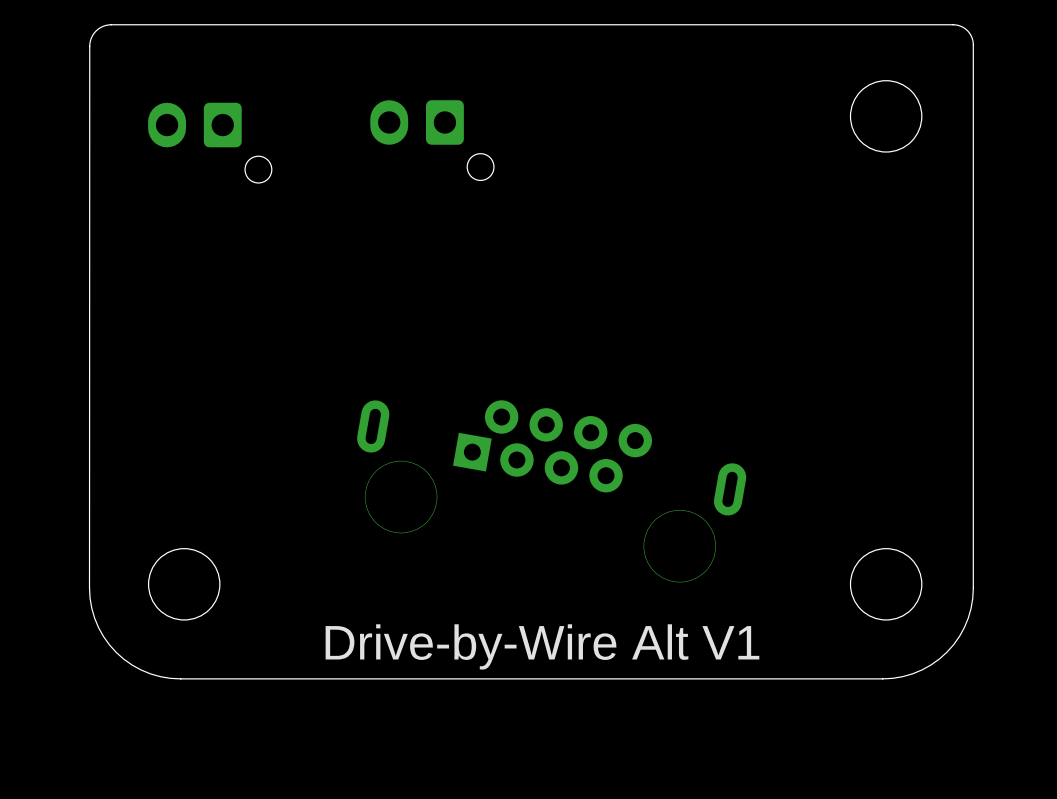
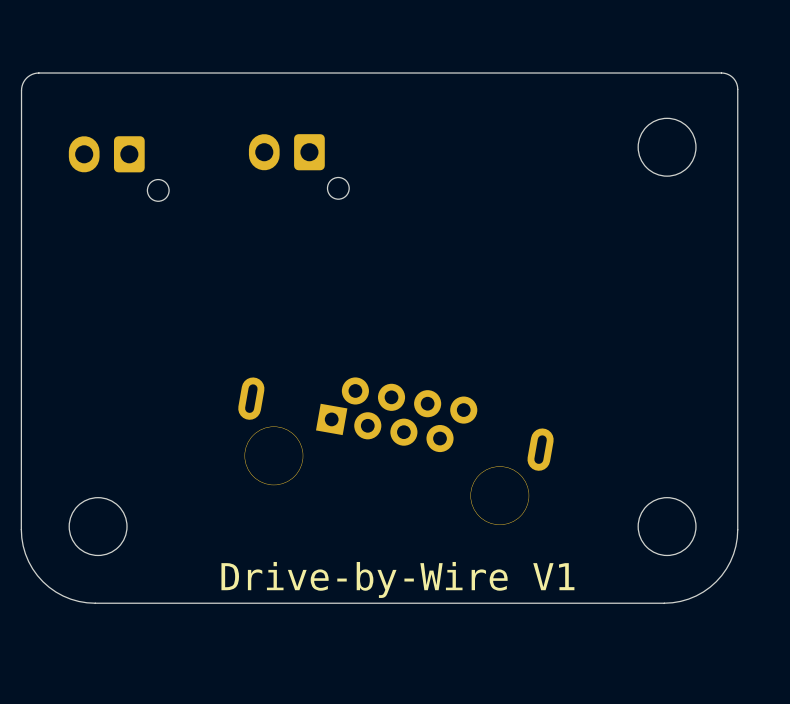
text: Drive-by-Wire Alt V1 (542, 646) -> Drive-by-Wire V1 (397, 579)

